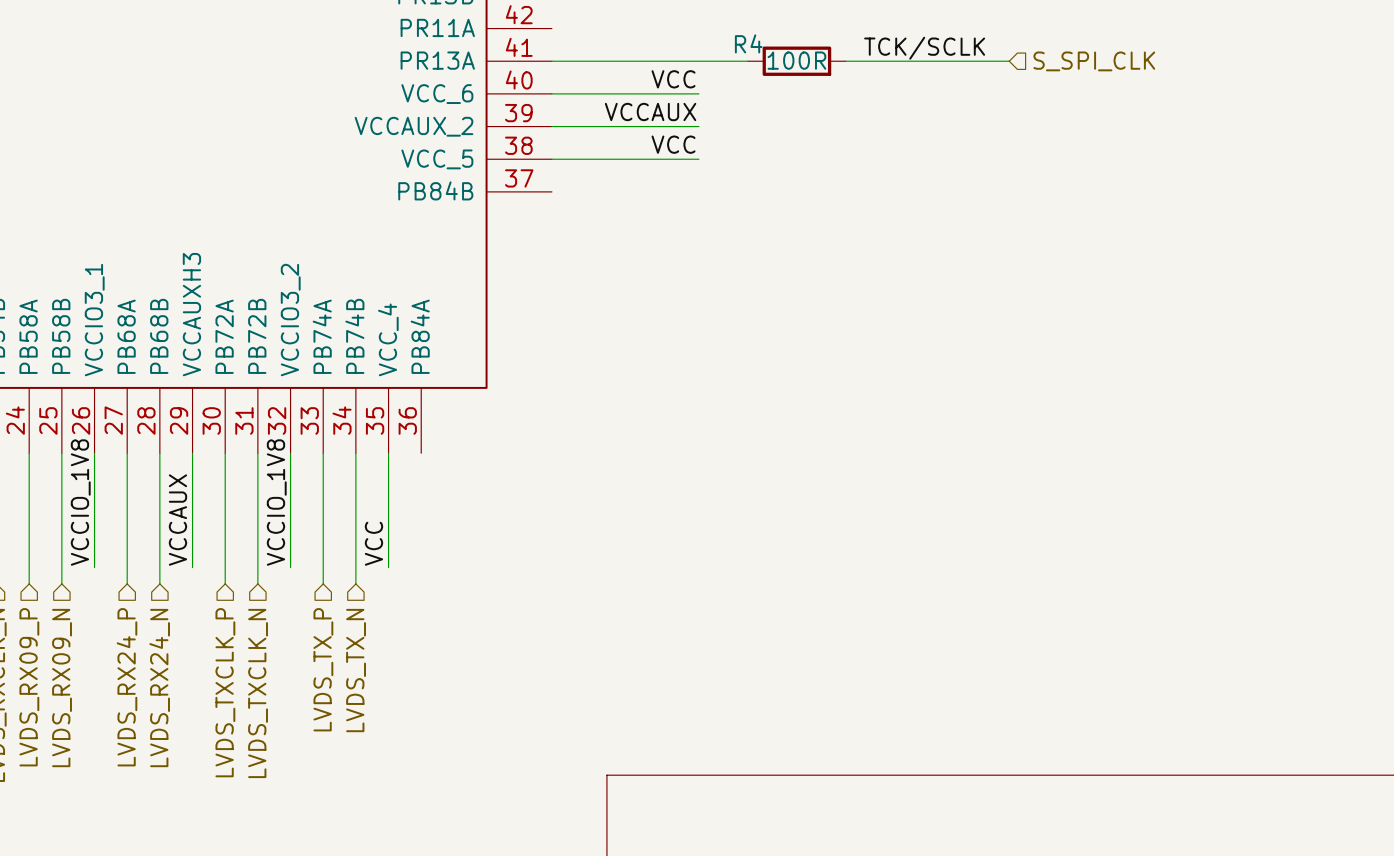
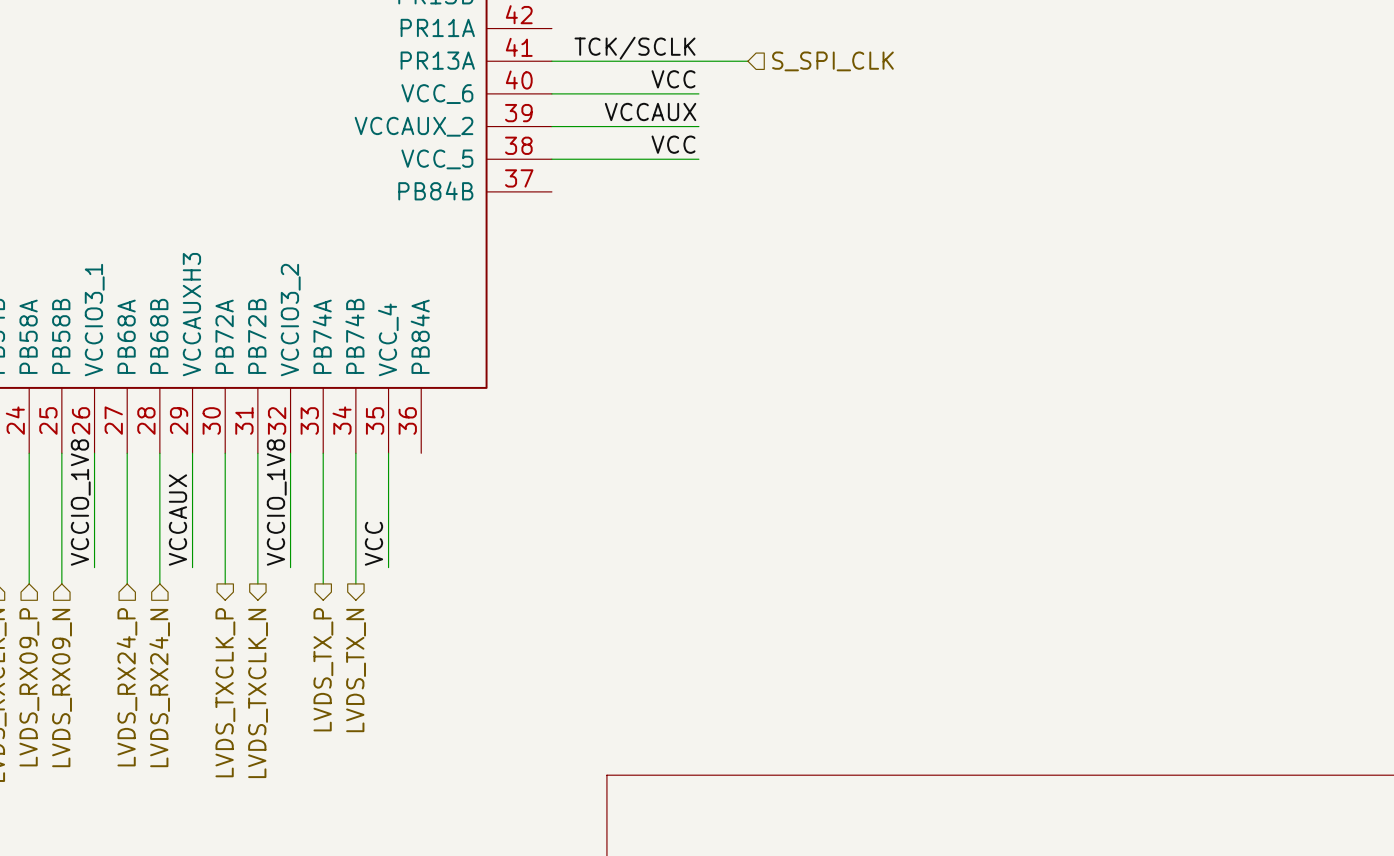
label position: TCK/SCLK (924, 48) -> TCK/SCLK (635, 48)
R4: 100R (796, 61) -> none
wire: (845, 61) (1009, 61) -> none
hierarchical label position: S_SPI_CLK (1094, 61) -> S_SPI_CLK (832, 61)
hierarchical label shape: input (323, 669) -> output (323, 669)
hierarchical label shape: input (356, 670) -> output (356, 670)
hierarchical label shape: input (225, 692) -> output (225, 692)
hierarchical label shape: input (258, 693) -> output (258, 693)

